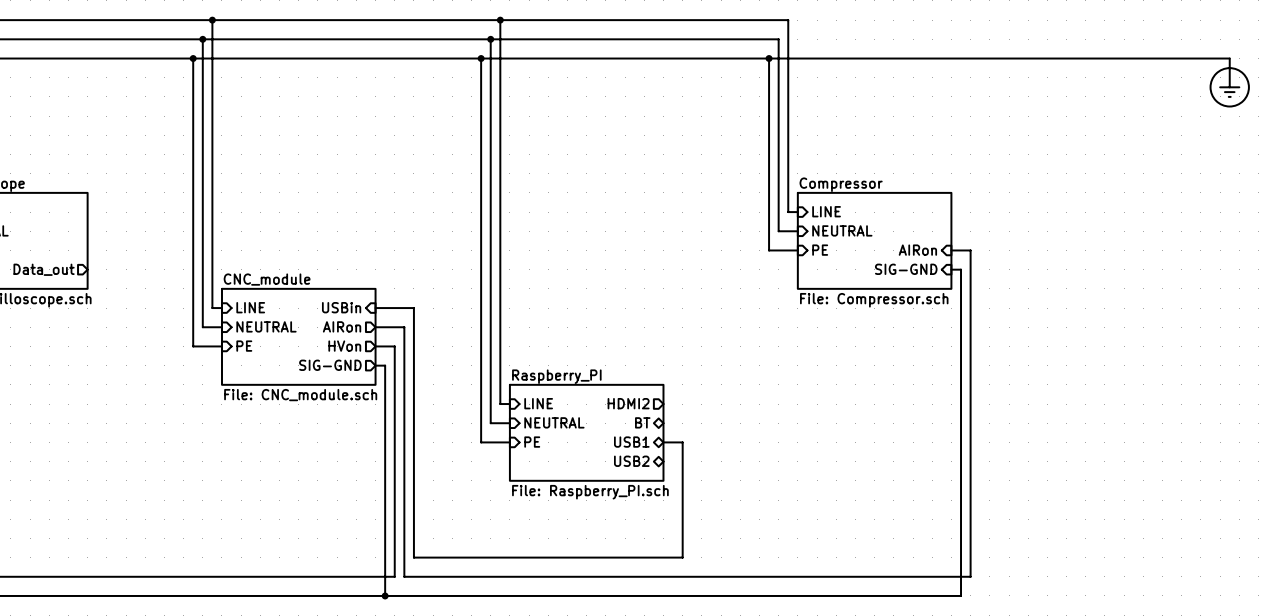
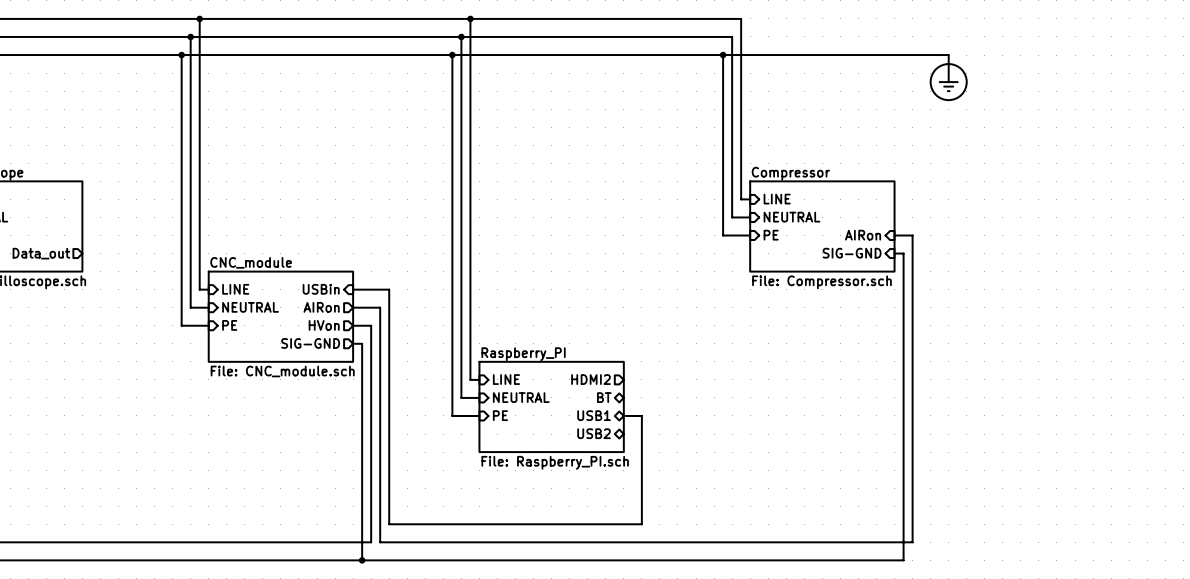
wire: (1009, 58) (1229, 58) -> none
power symbol: none -> (948, 77)
power symbol: (1229, 82) -> none

